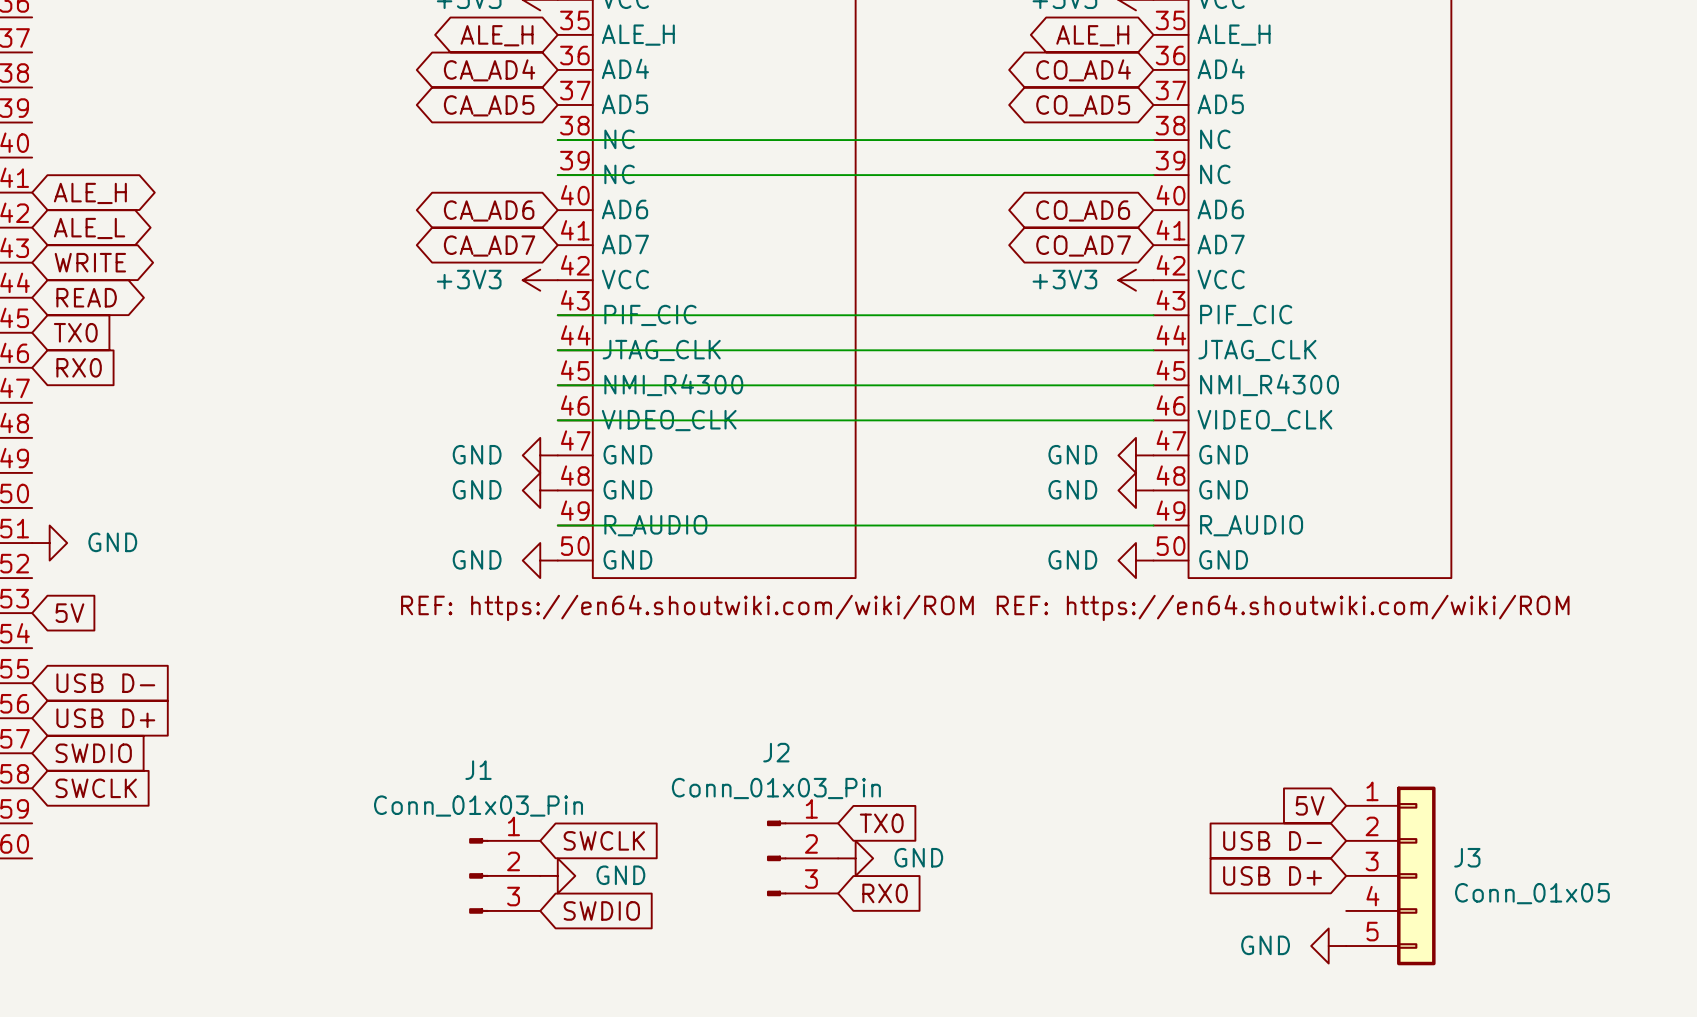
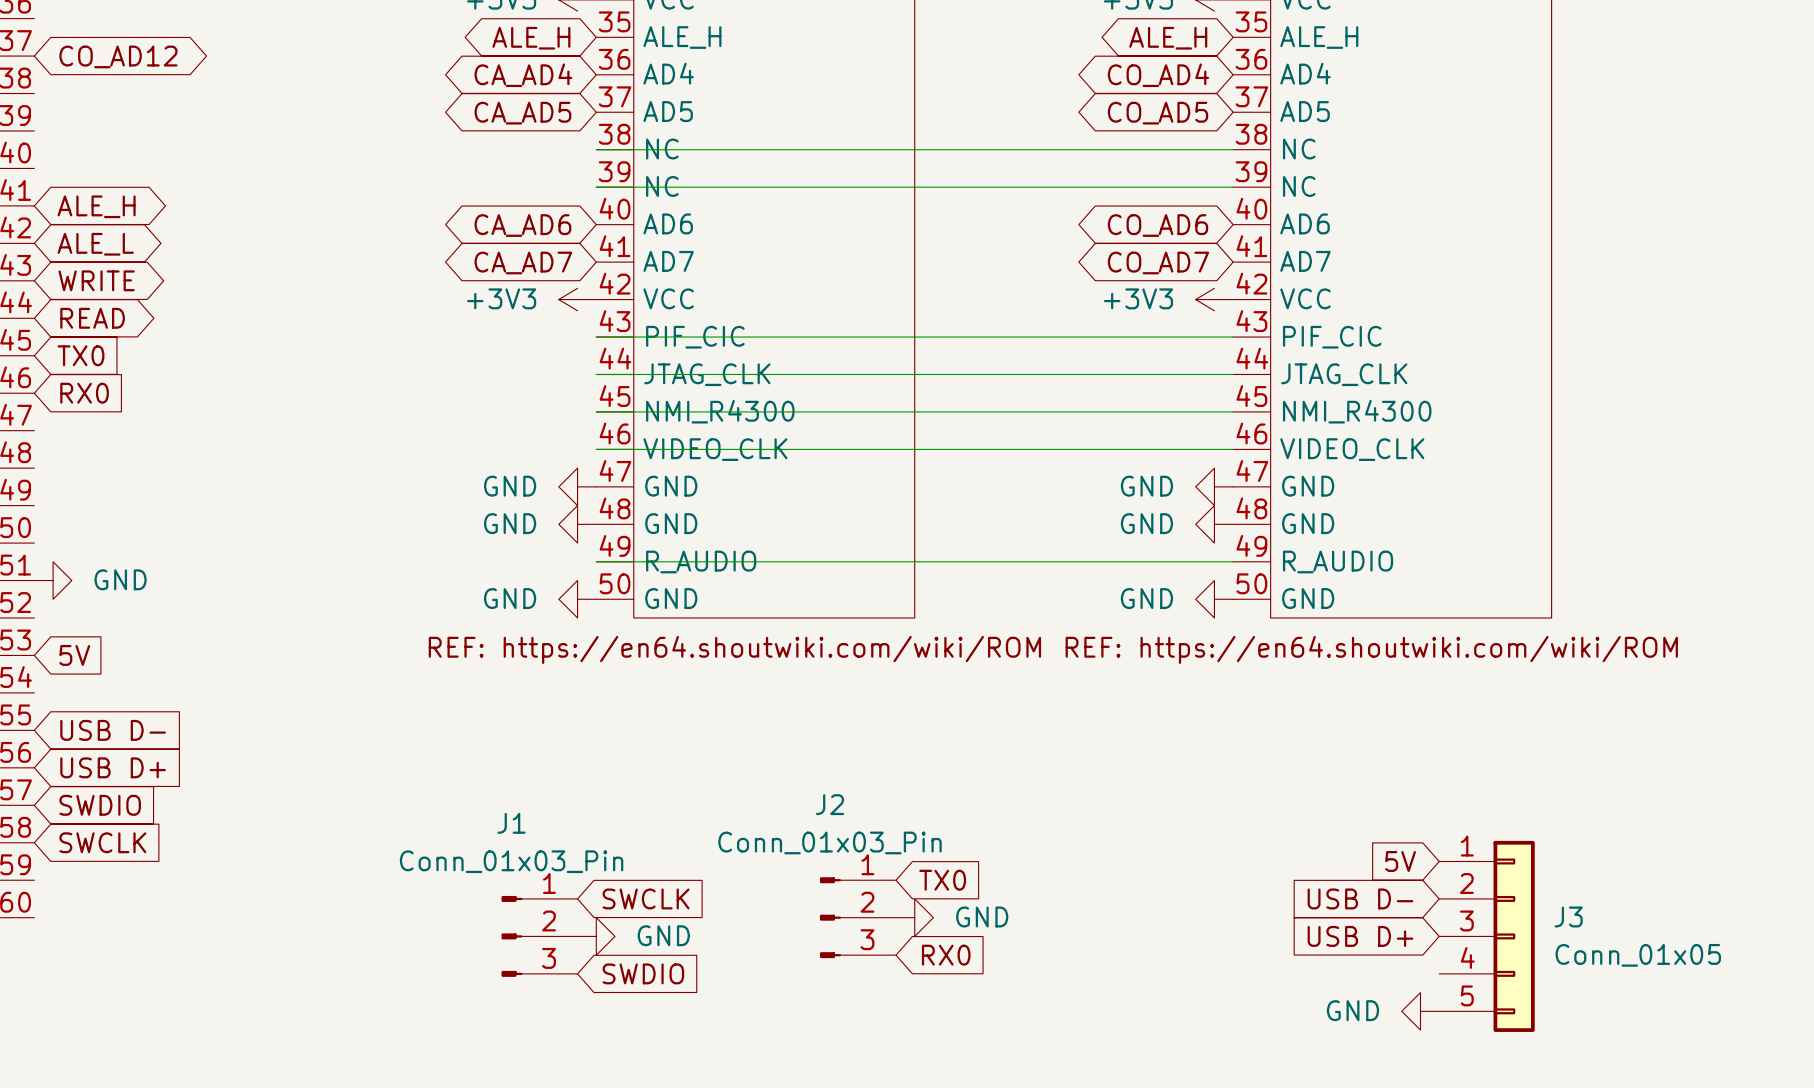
global label: none -> CO_AD12 (118, 56)

